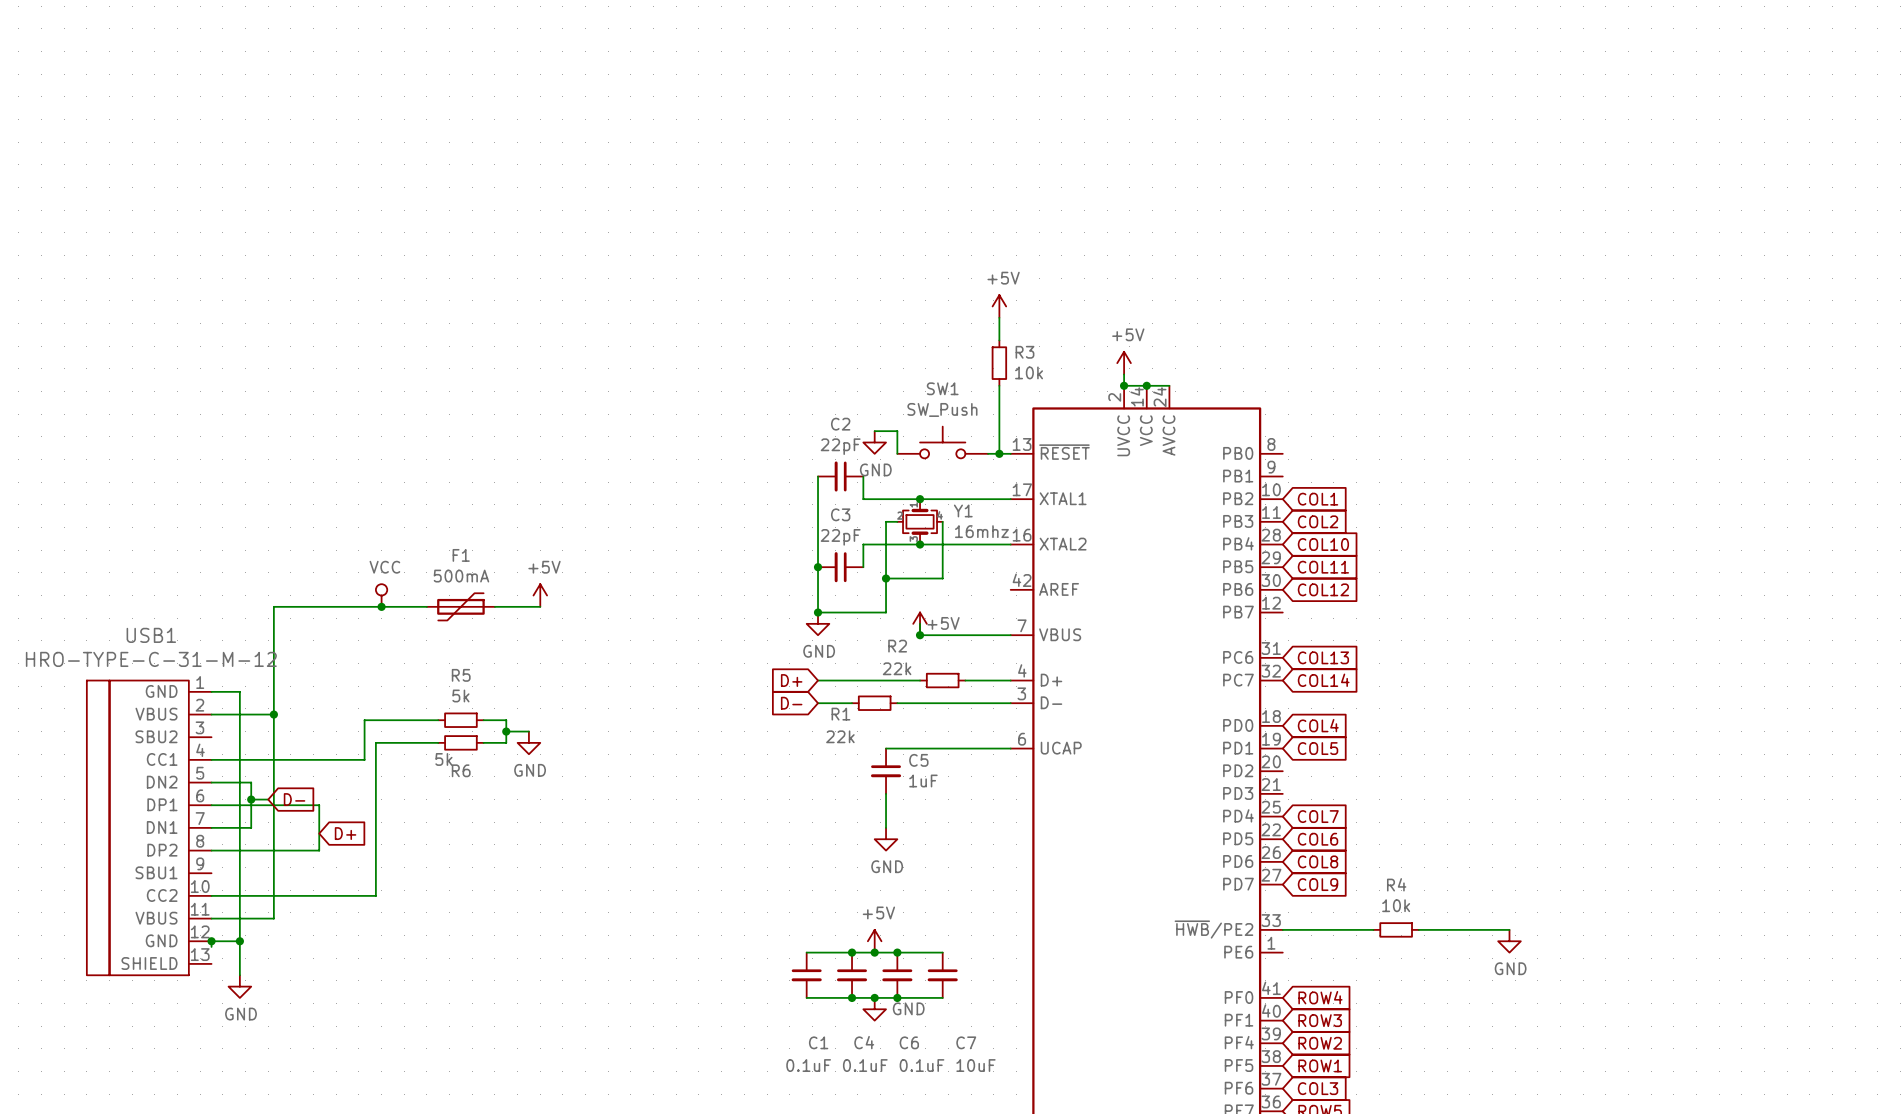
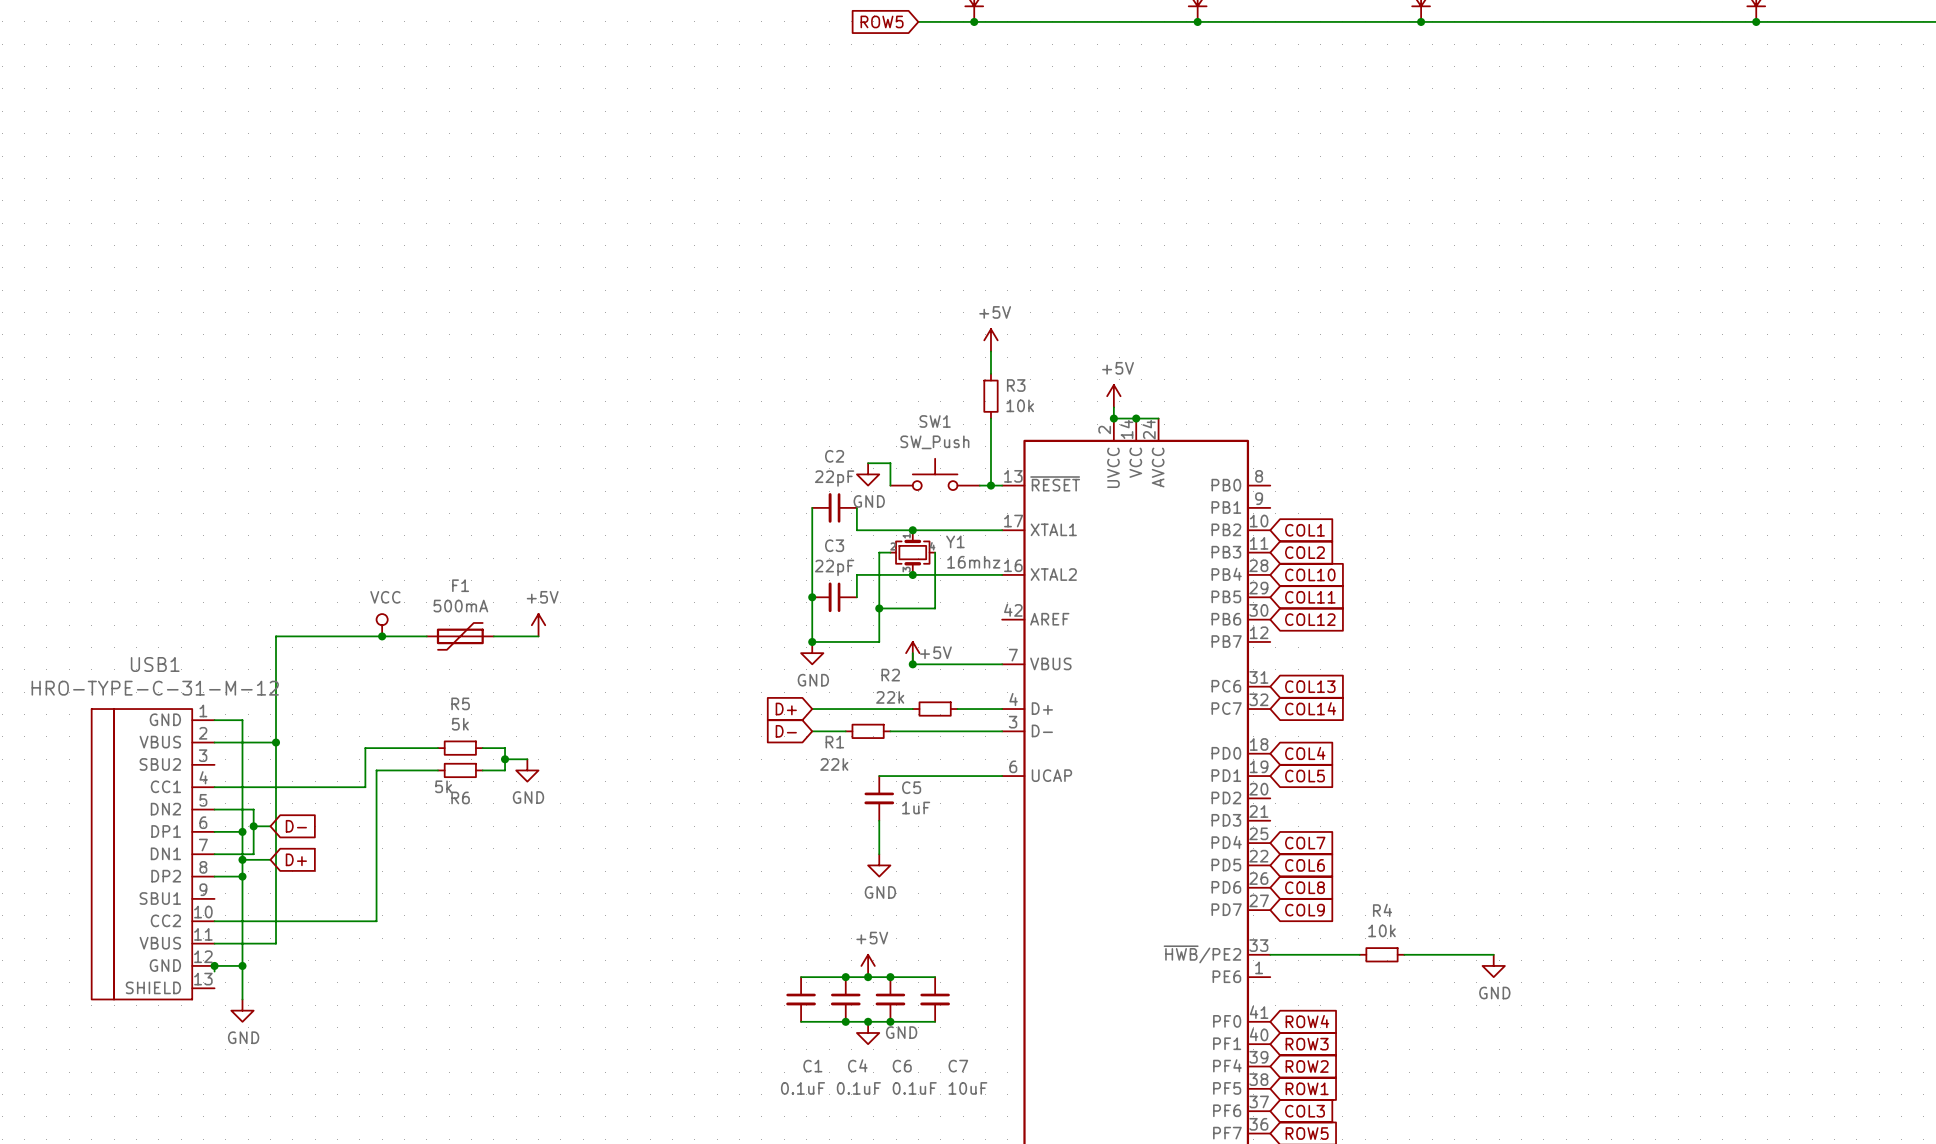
wire: (239, 805) (319, 805) (319, 850) (239, 850) -> none
junction: none -> (242, 831)
wire: none -> (242, 859) (270, 859)
junction: none -> (242, 859)
global label position: D+ (345, 833) -> D+ (296, 859)
junction: none -> (242, 876)

